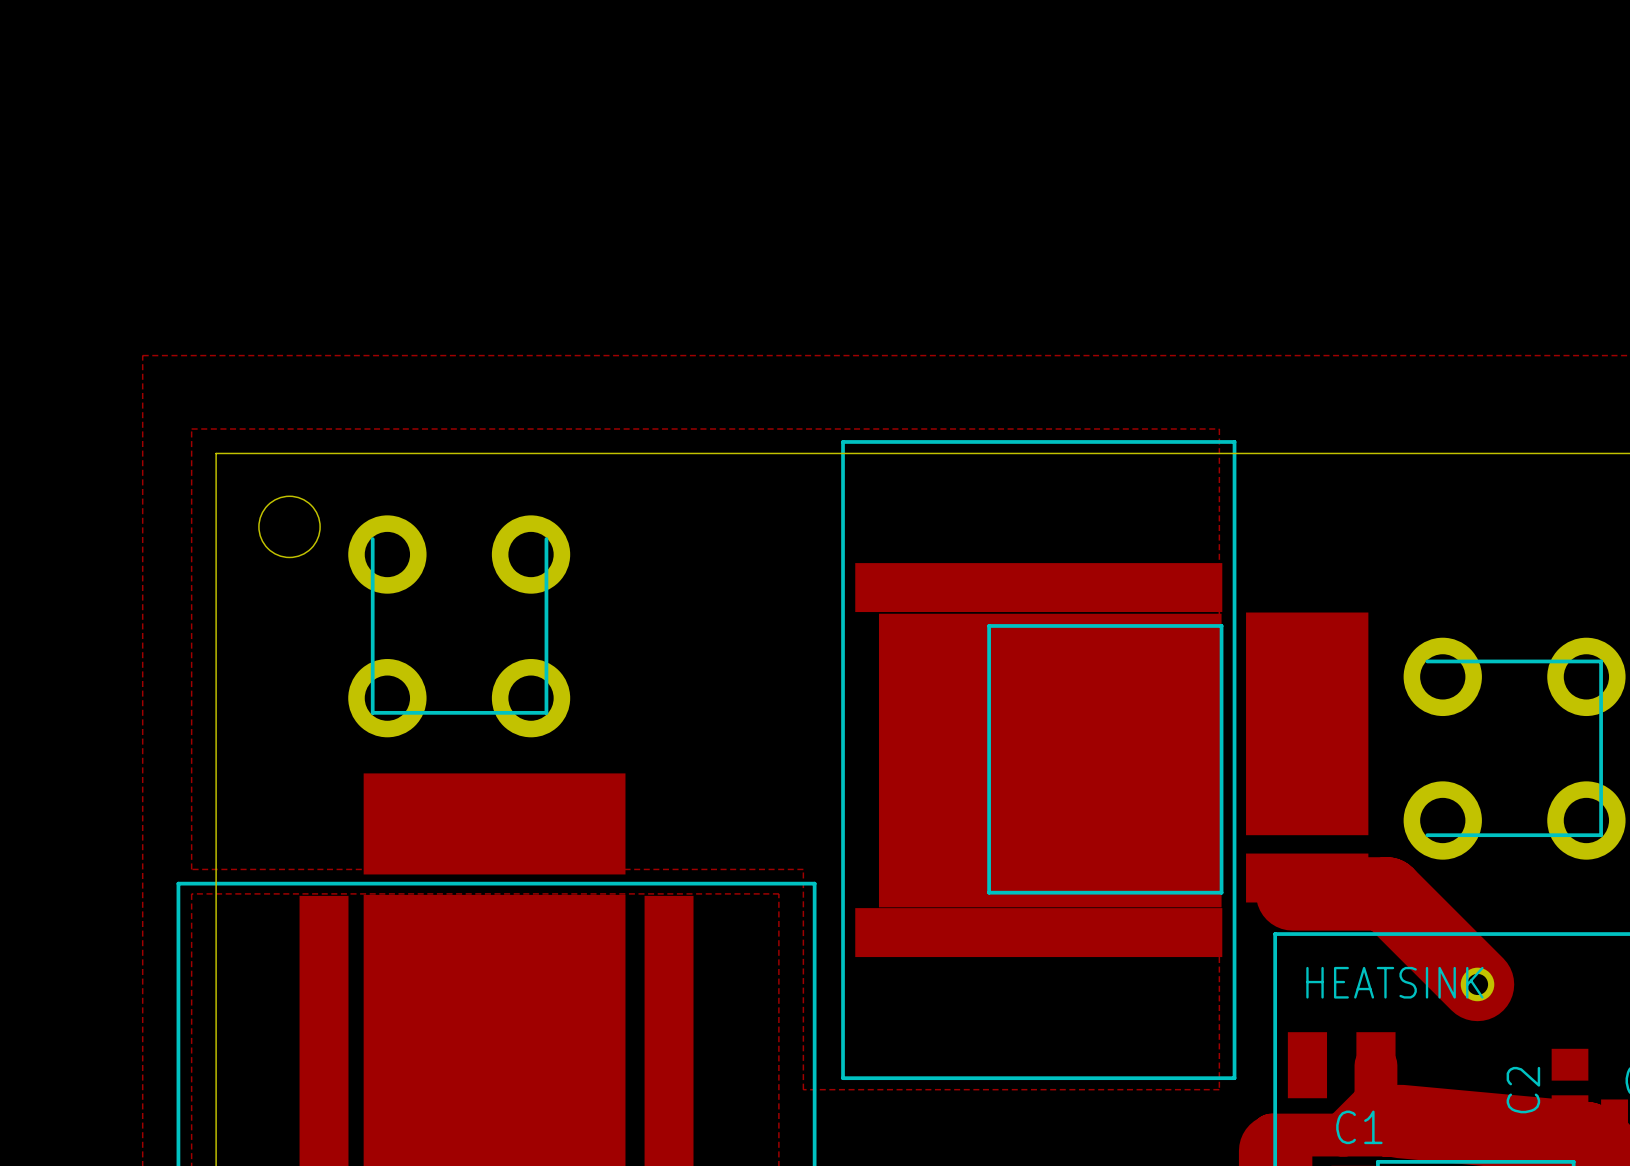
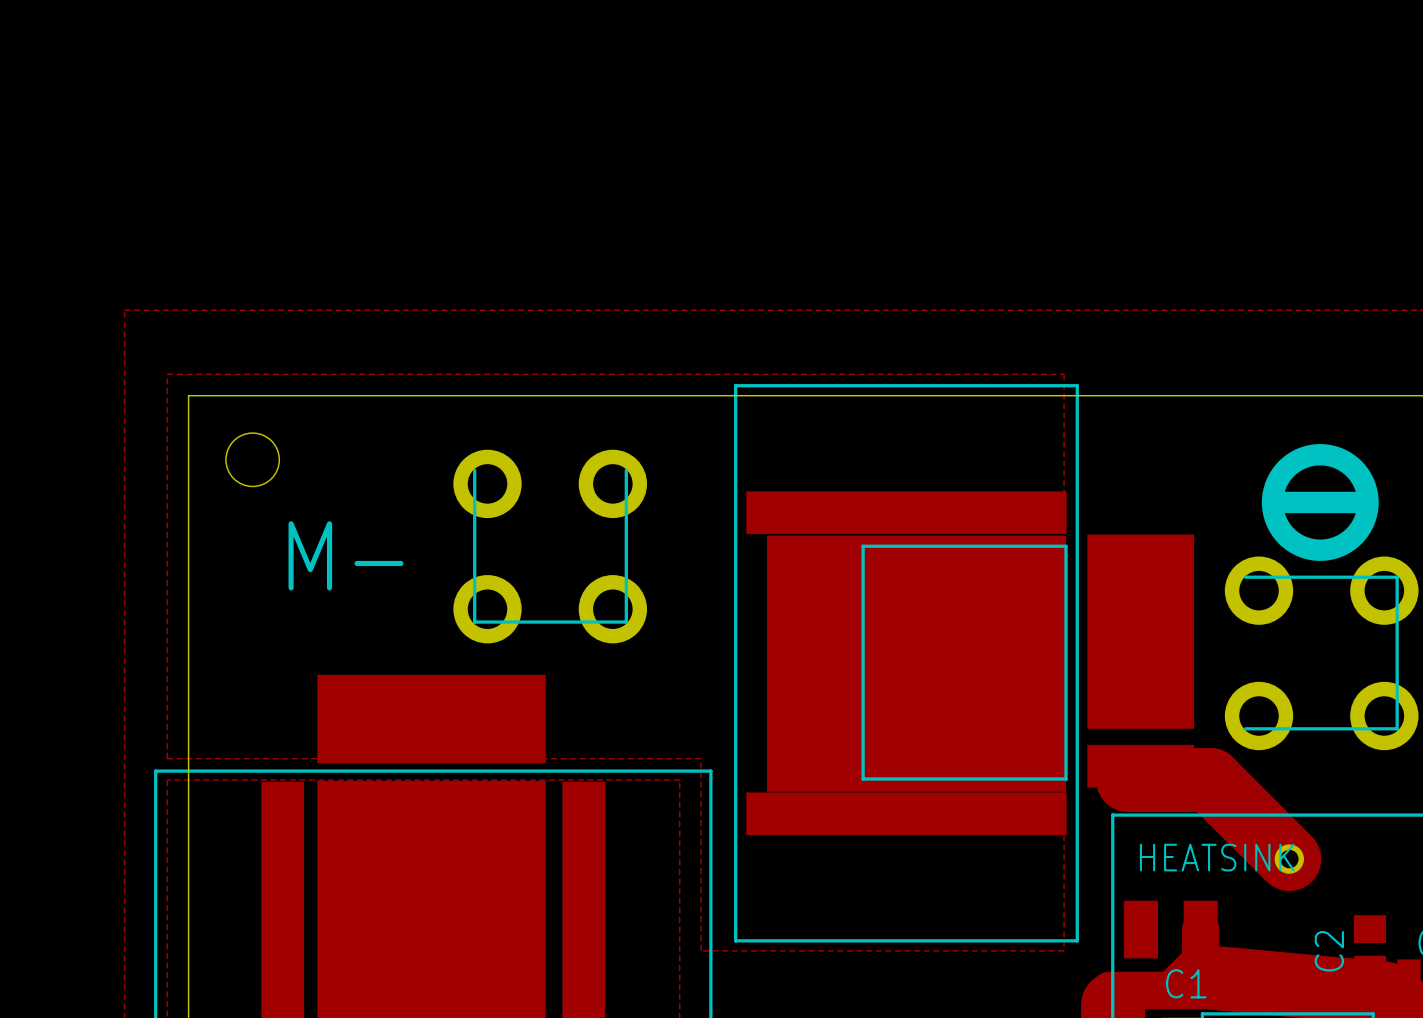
drawing: none -> [1261, 444, 1379, 561]
line: none -> (1277, 502) (1363, 502)
part position: (459, 626) -> (550, 546)
text: none -> M- (346, 555)

